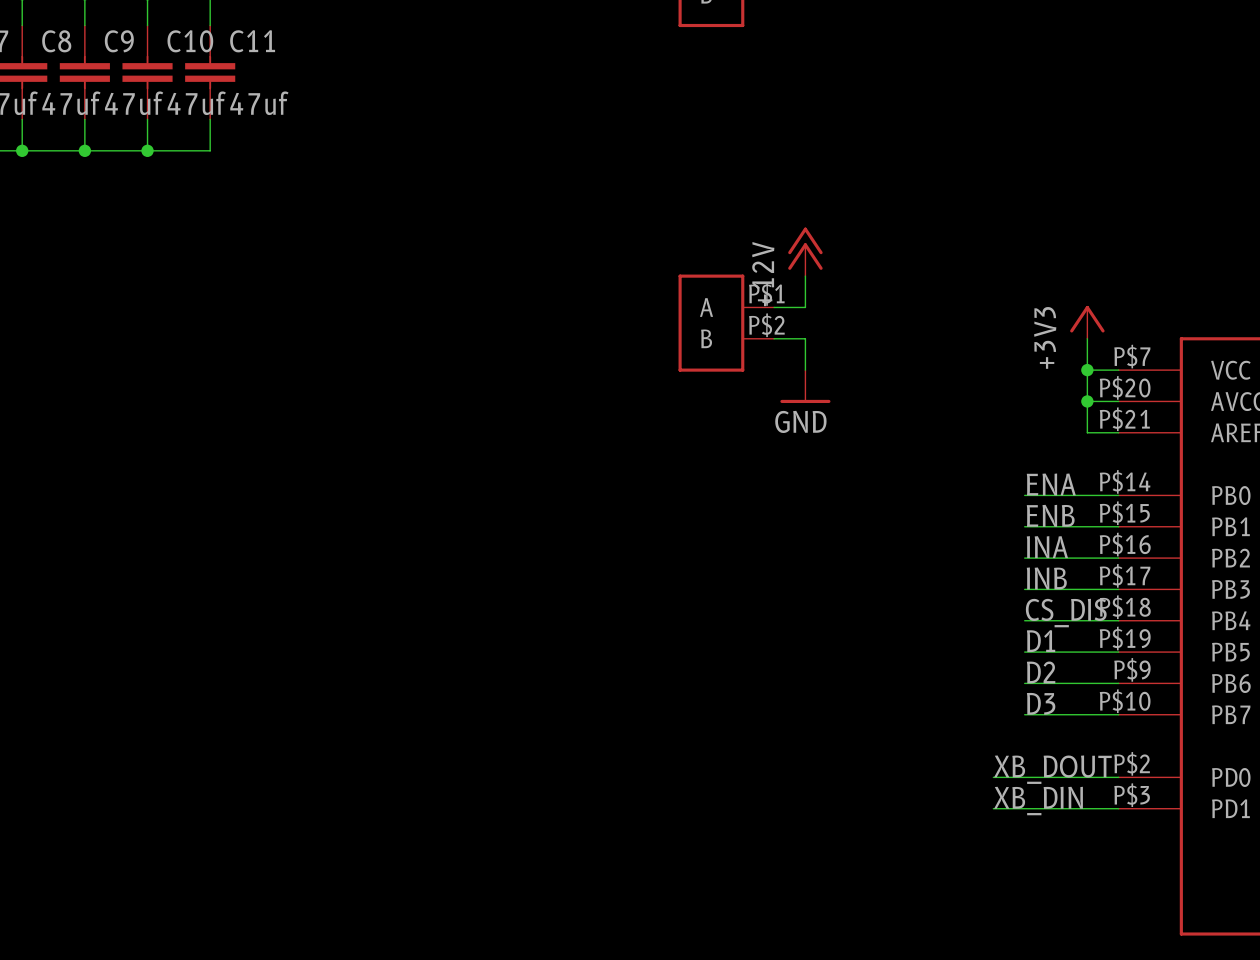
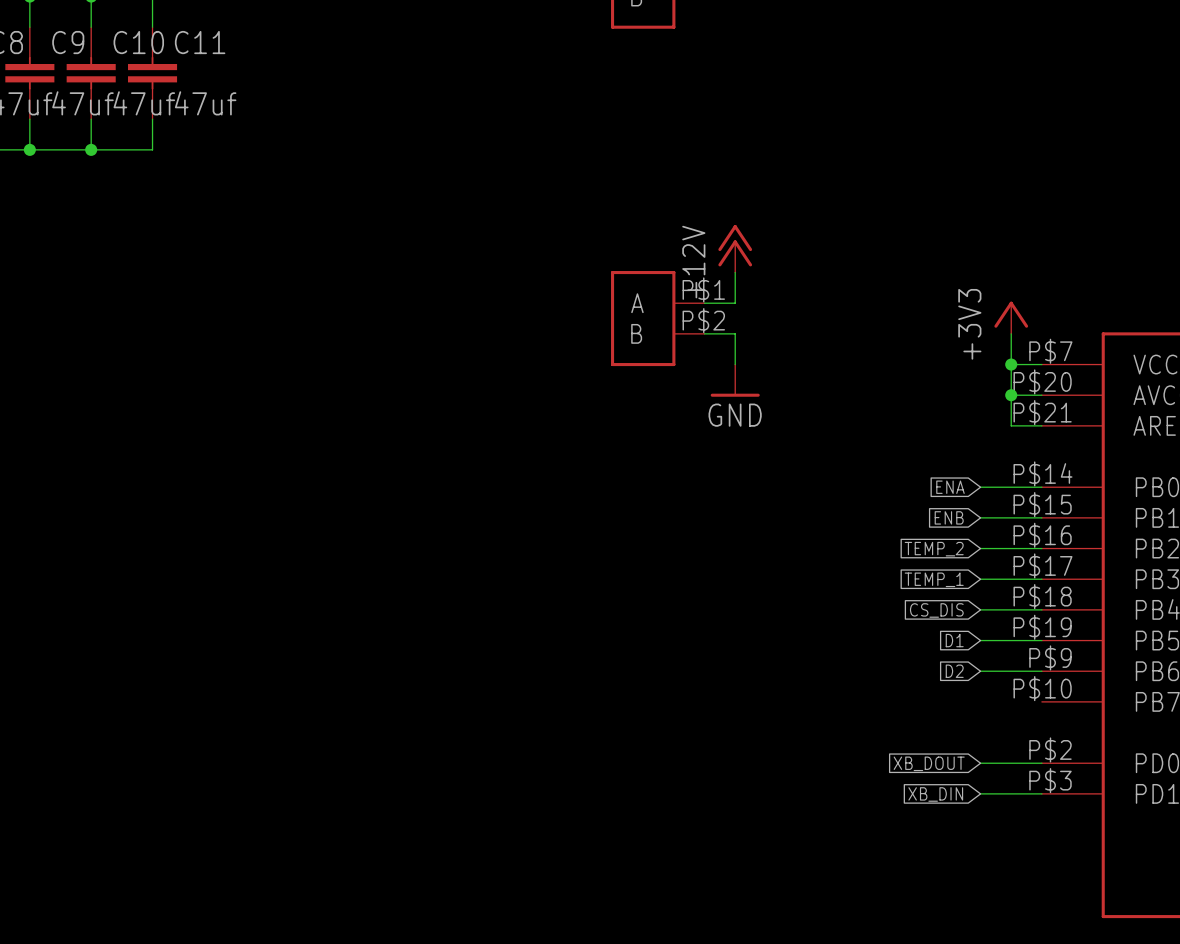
label: ENA (1051, 484) -> none
wire: (1024, 495) (1056, 495) -> none
global label: none -> ENA (950, 487)
label: ENB (1050, 515) -> none
wire: (1024, 526) (1056, 526) -> none
global label: none -> ENB (949, 517)
label: INA (1047, 547) -> none
wire: (1024, 558) (1056, 558) -> none
global label: none -> TEMP_2 (934, 549)
label: INB (1046, 578) -> none
wire: (1024, 589) (1056, 589) -> none
global label: none -> TEMP_1 (934, 579)
label: CS_DIS (1066, 613) -> none
wire: (1024, 620) (1056, 620) -> none
global label: none -> CS_DIS (936, 610)
label: D1 (1041, 641) -> none
wire: (1024, 652) (1056, 652) -> none
global label: none -> D1 (954, 640)
label: D2 (1041, 672) -> none
wire: (1024, 683) (1056, 683) -> none
global label: none -> D2 (954, 671)
label: D3 (1041, 703) -> none
wire: (1024, 714) (1118, 714) -> none
label: XB_DOUT (1052, 769) -> none
wire: (993, 777) (1056, 777) -> none
global label: none -> XB_DOUT (929, 763)
label: XB_DIN (1038, 801) -> none
wire: (993, 808) (1056, 808) -> none
global label: none -> XB_DIN (935, 794)

